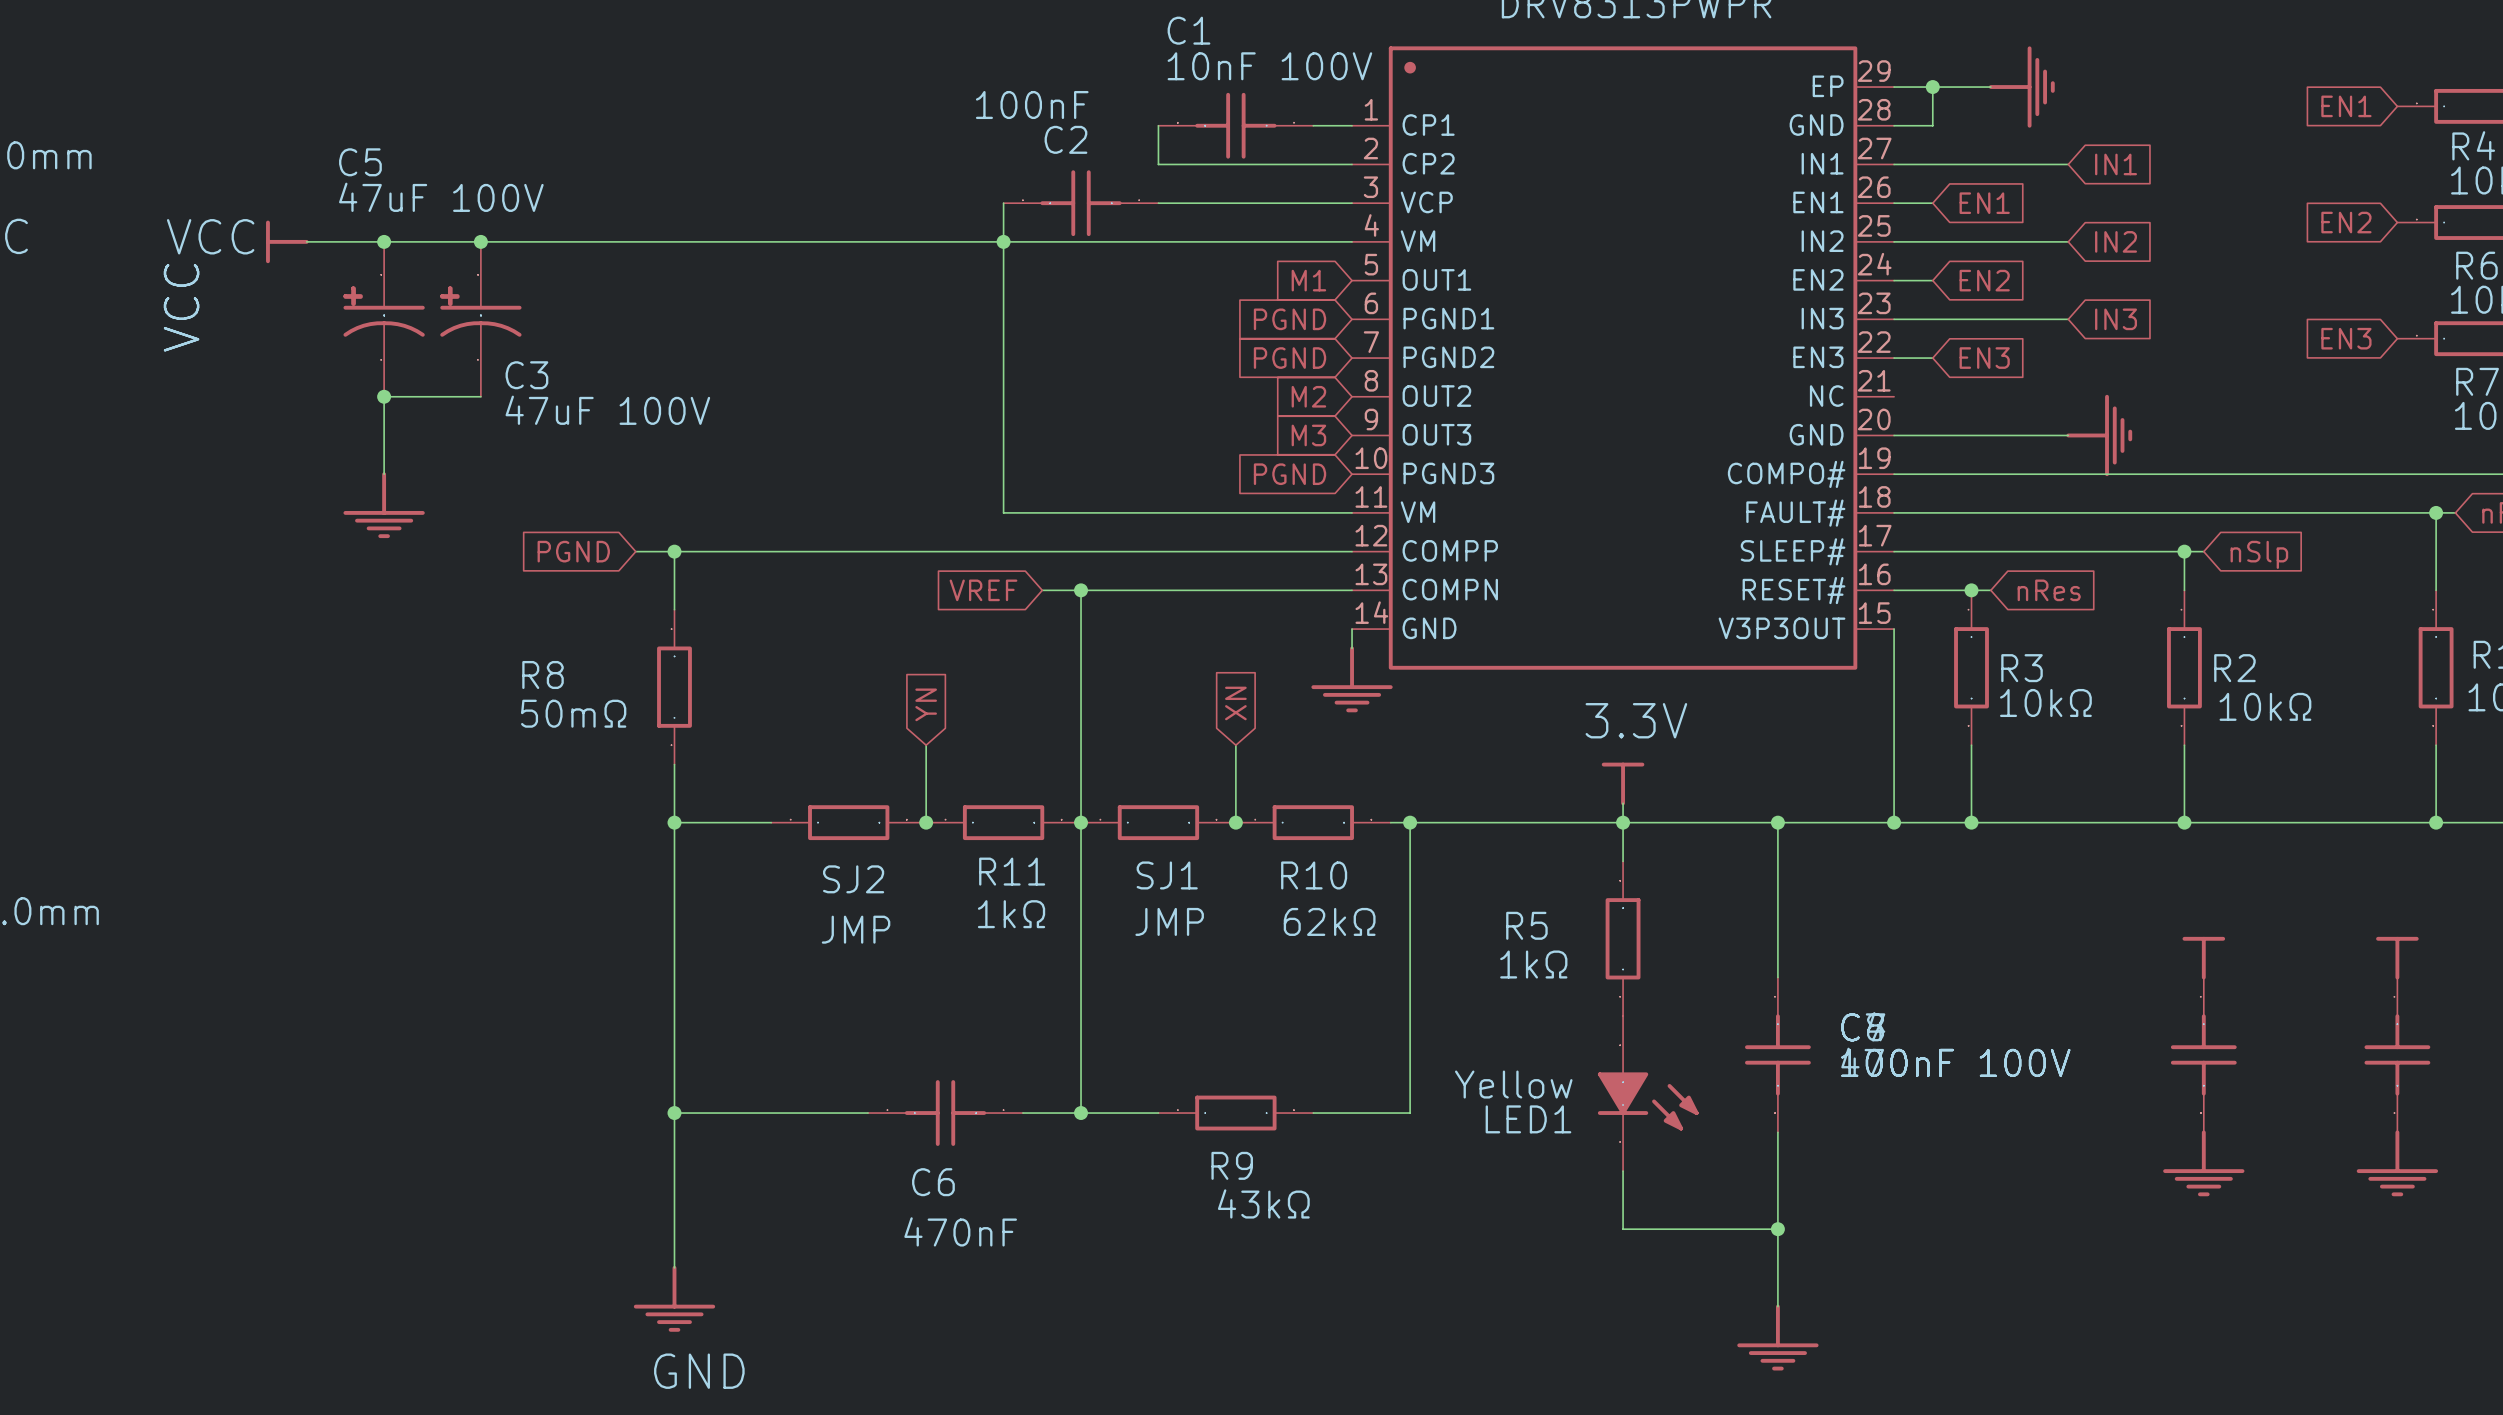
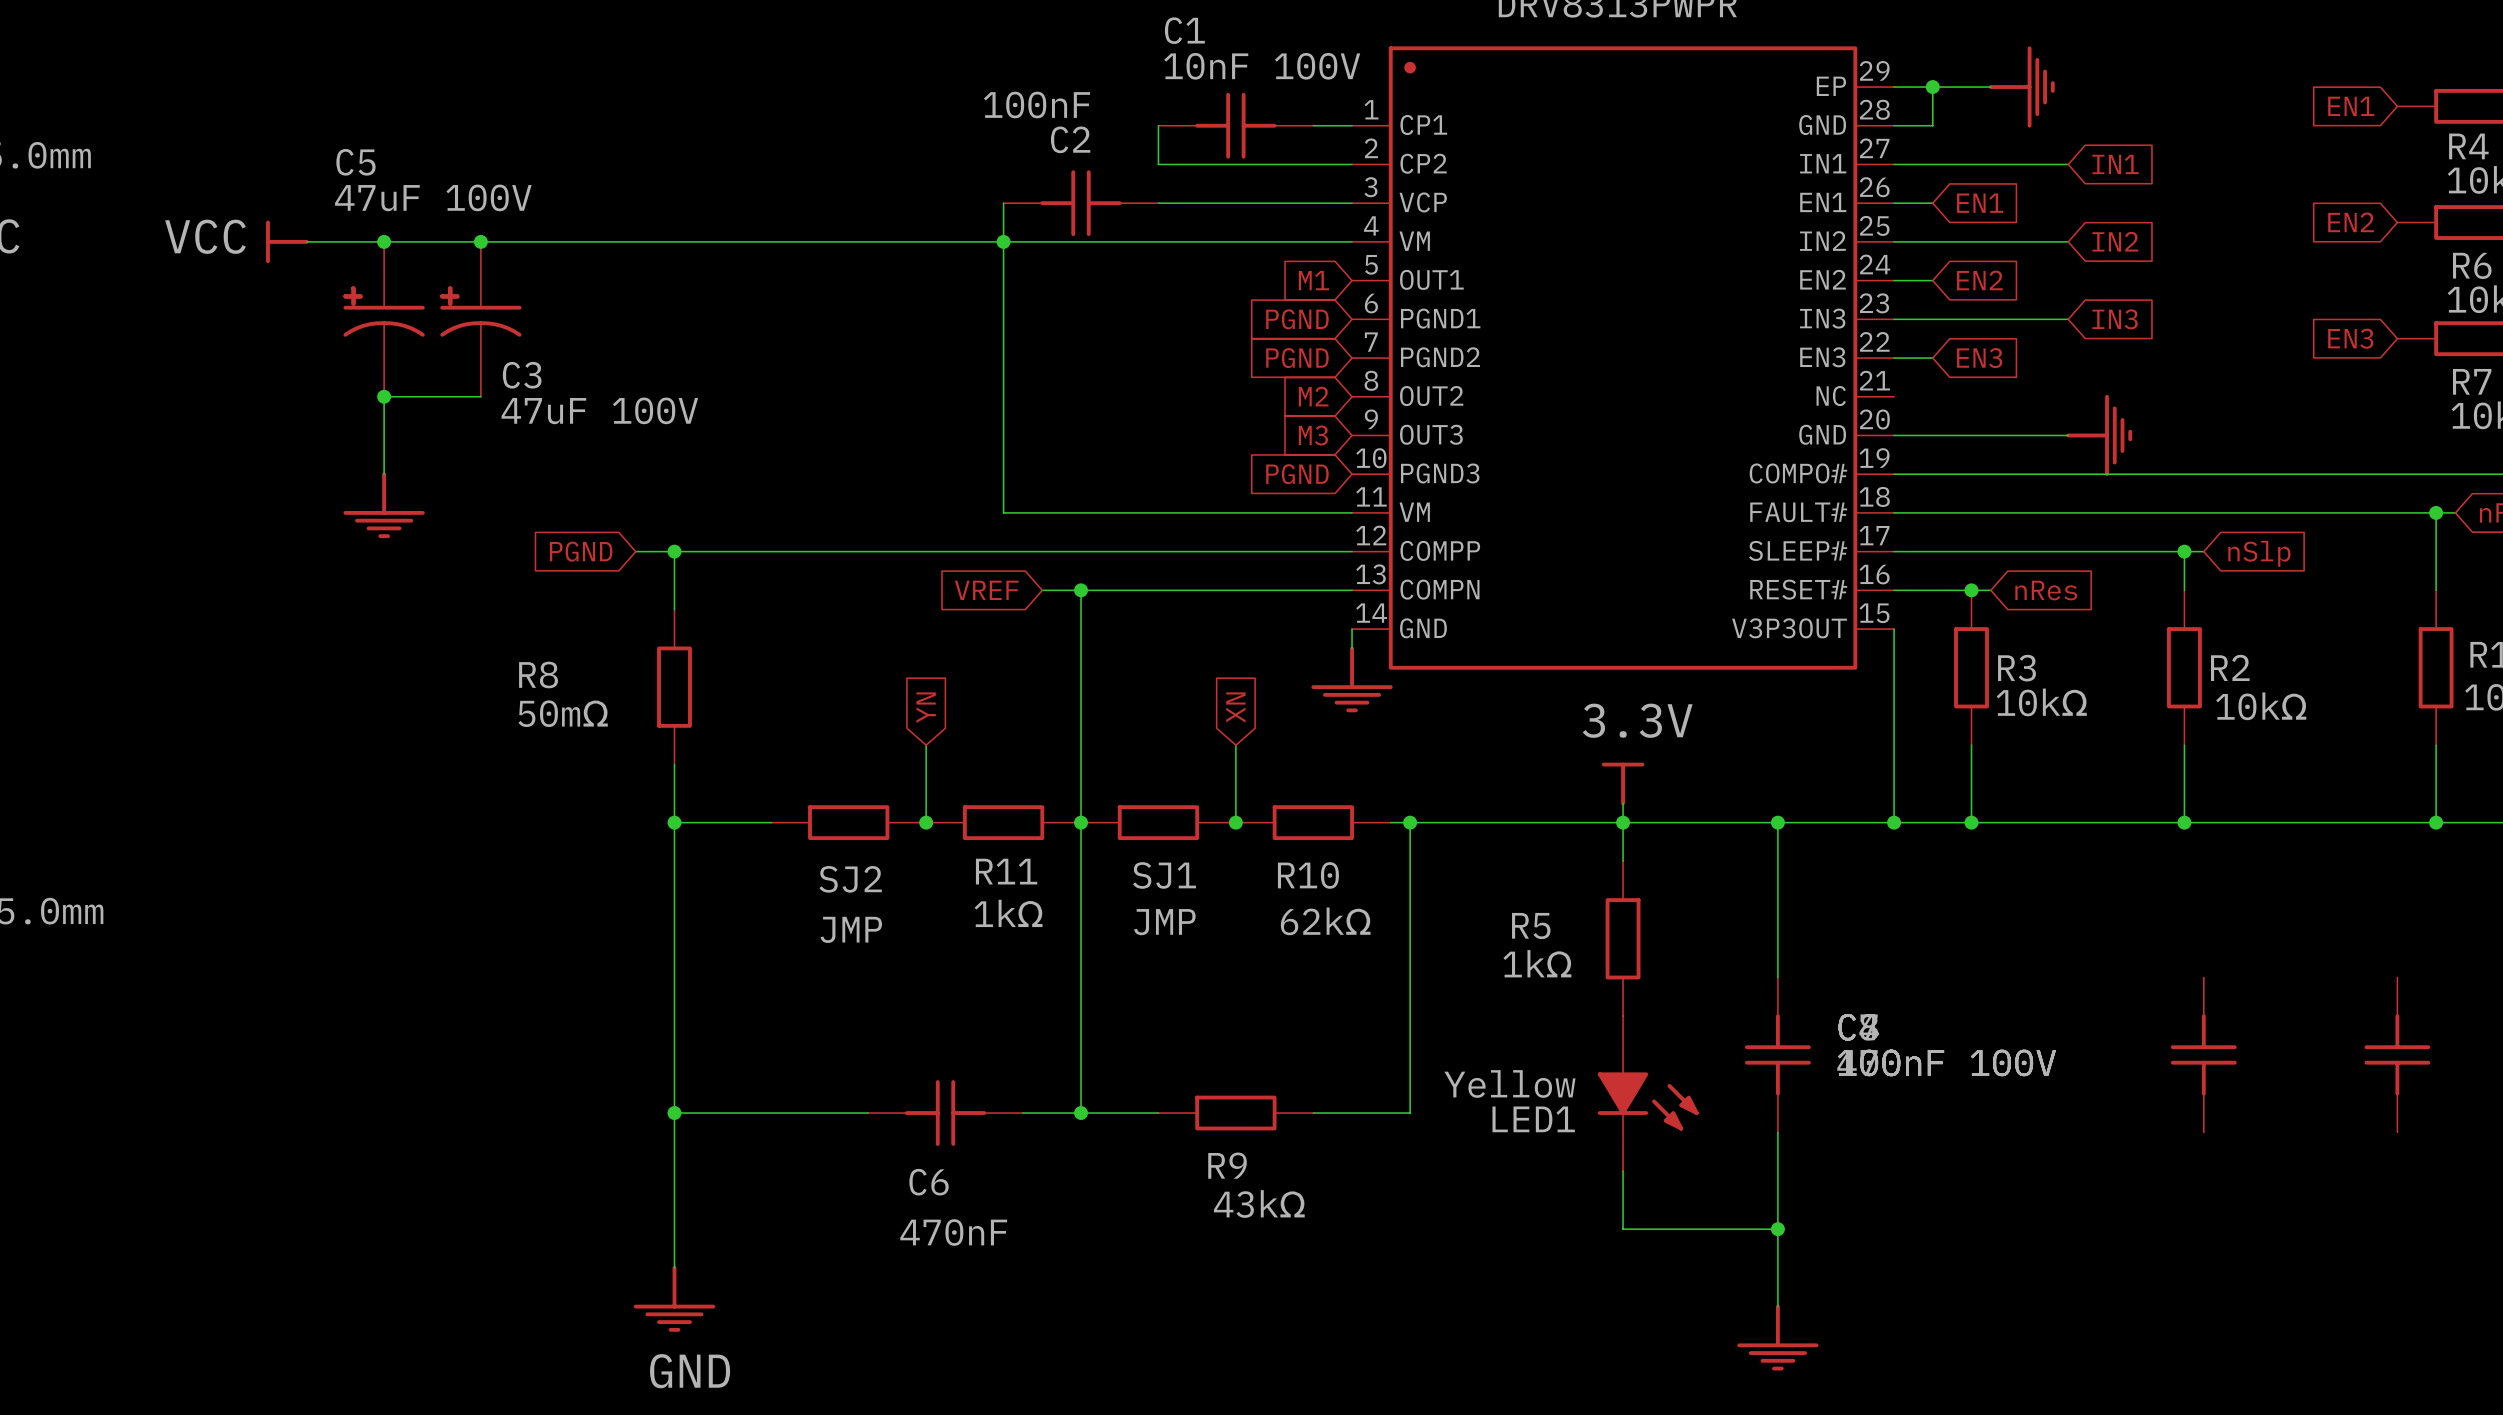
power symbol: VCC (2203, 958) -> none
power symbol: VCC (2397, 958) -> none
power symbol: (2203, 1163) -> none
power symbol: (2397, 1163) -> none

